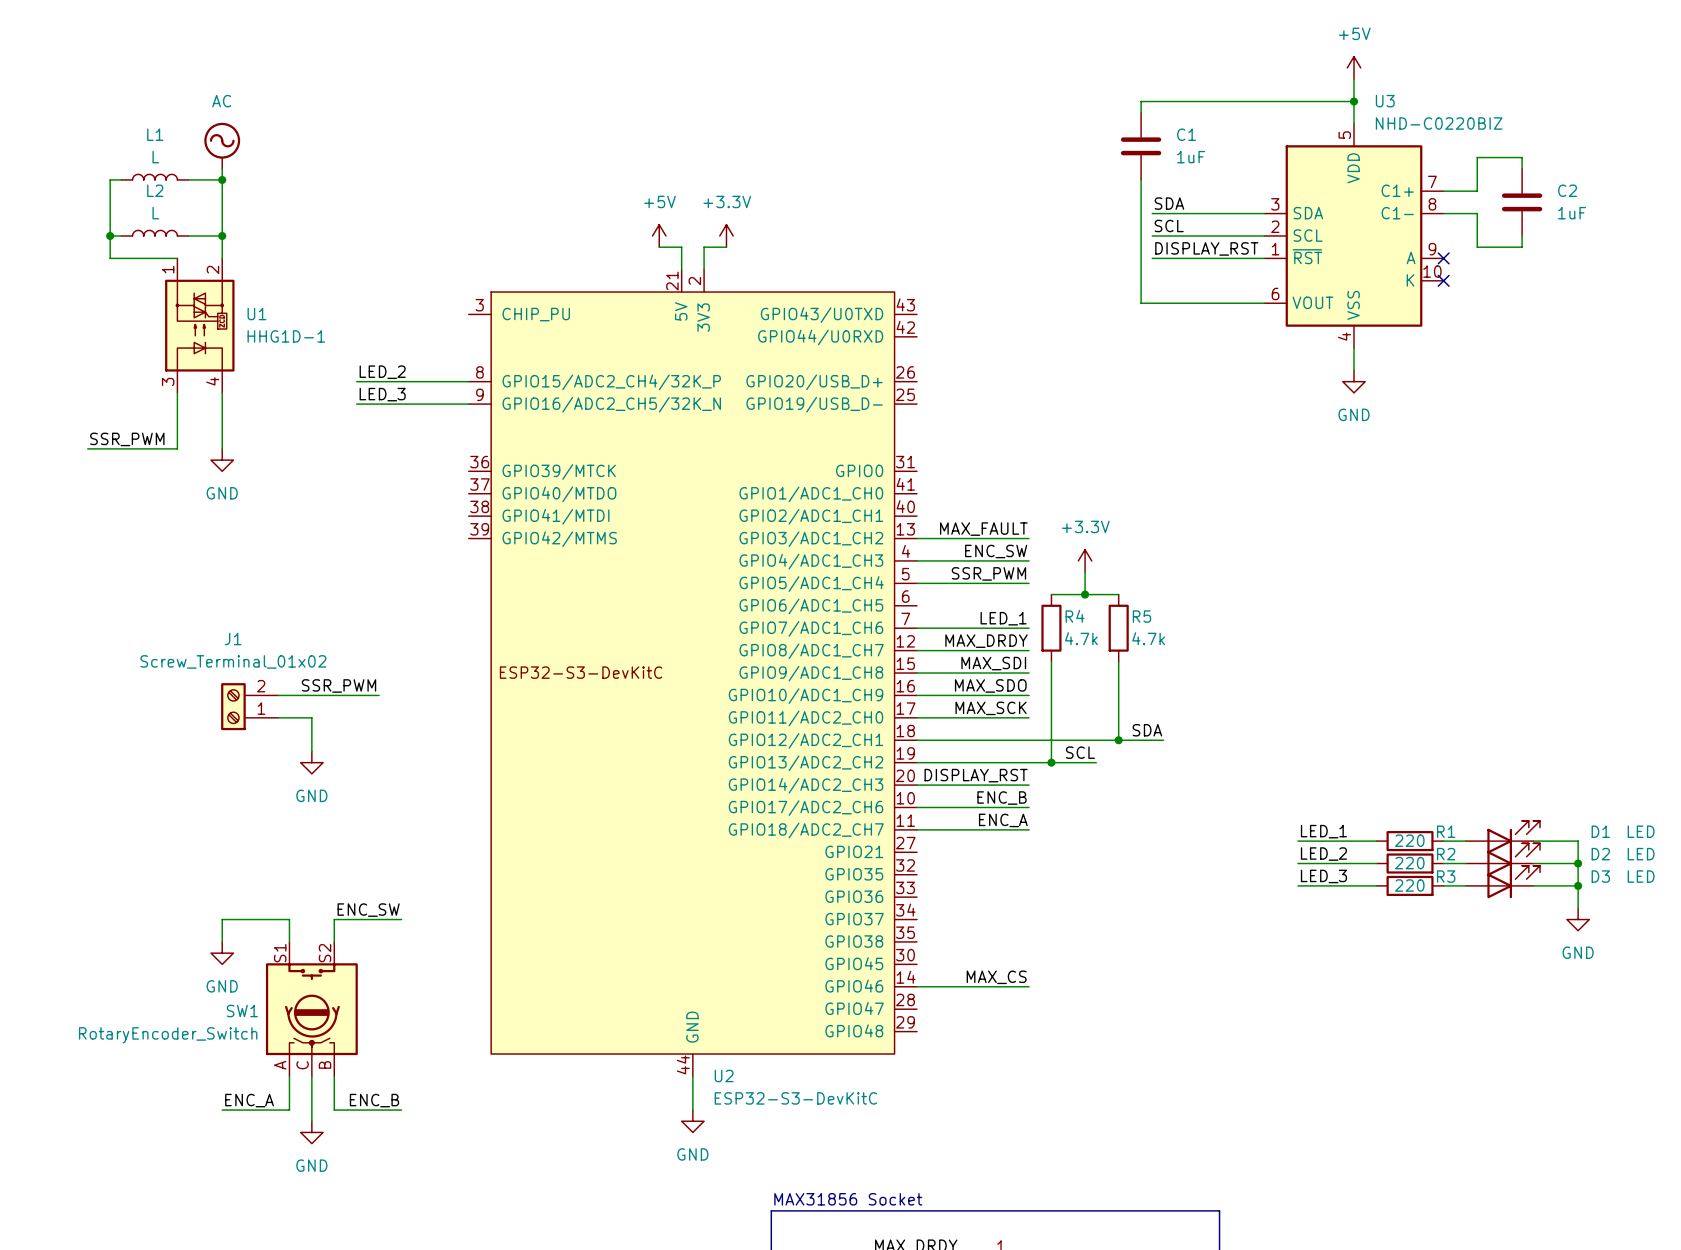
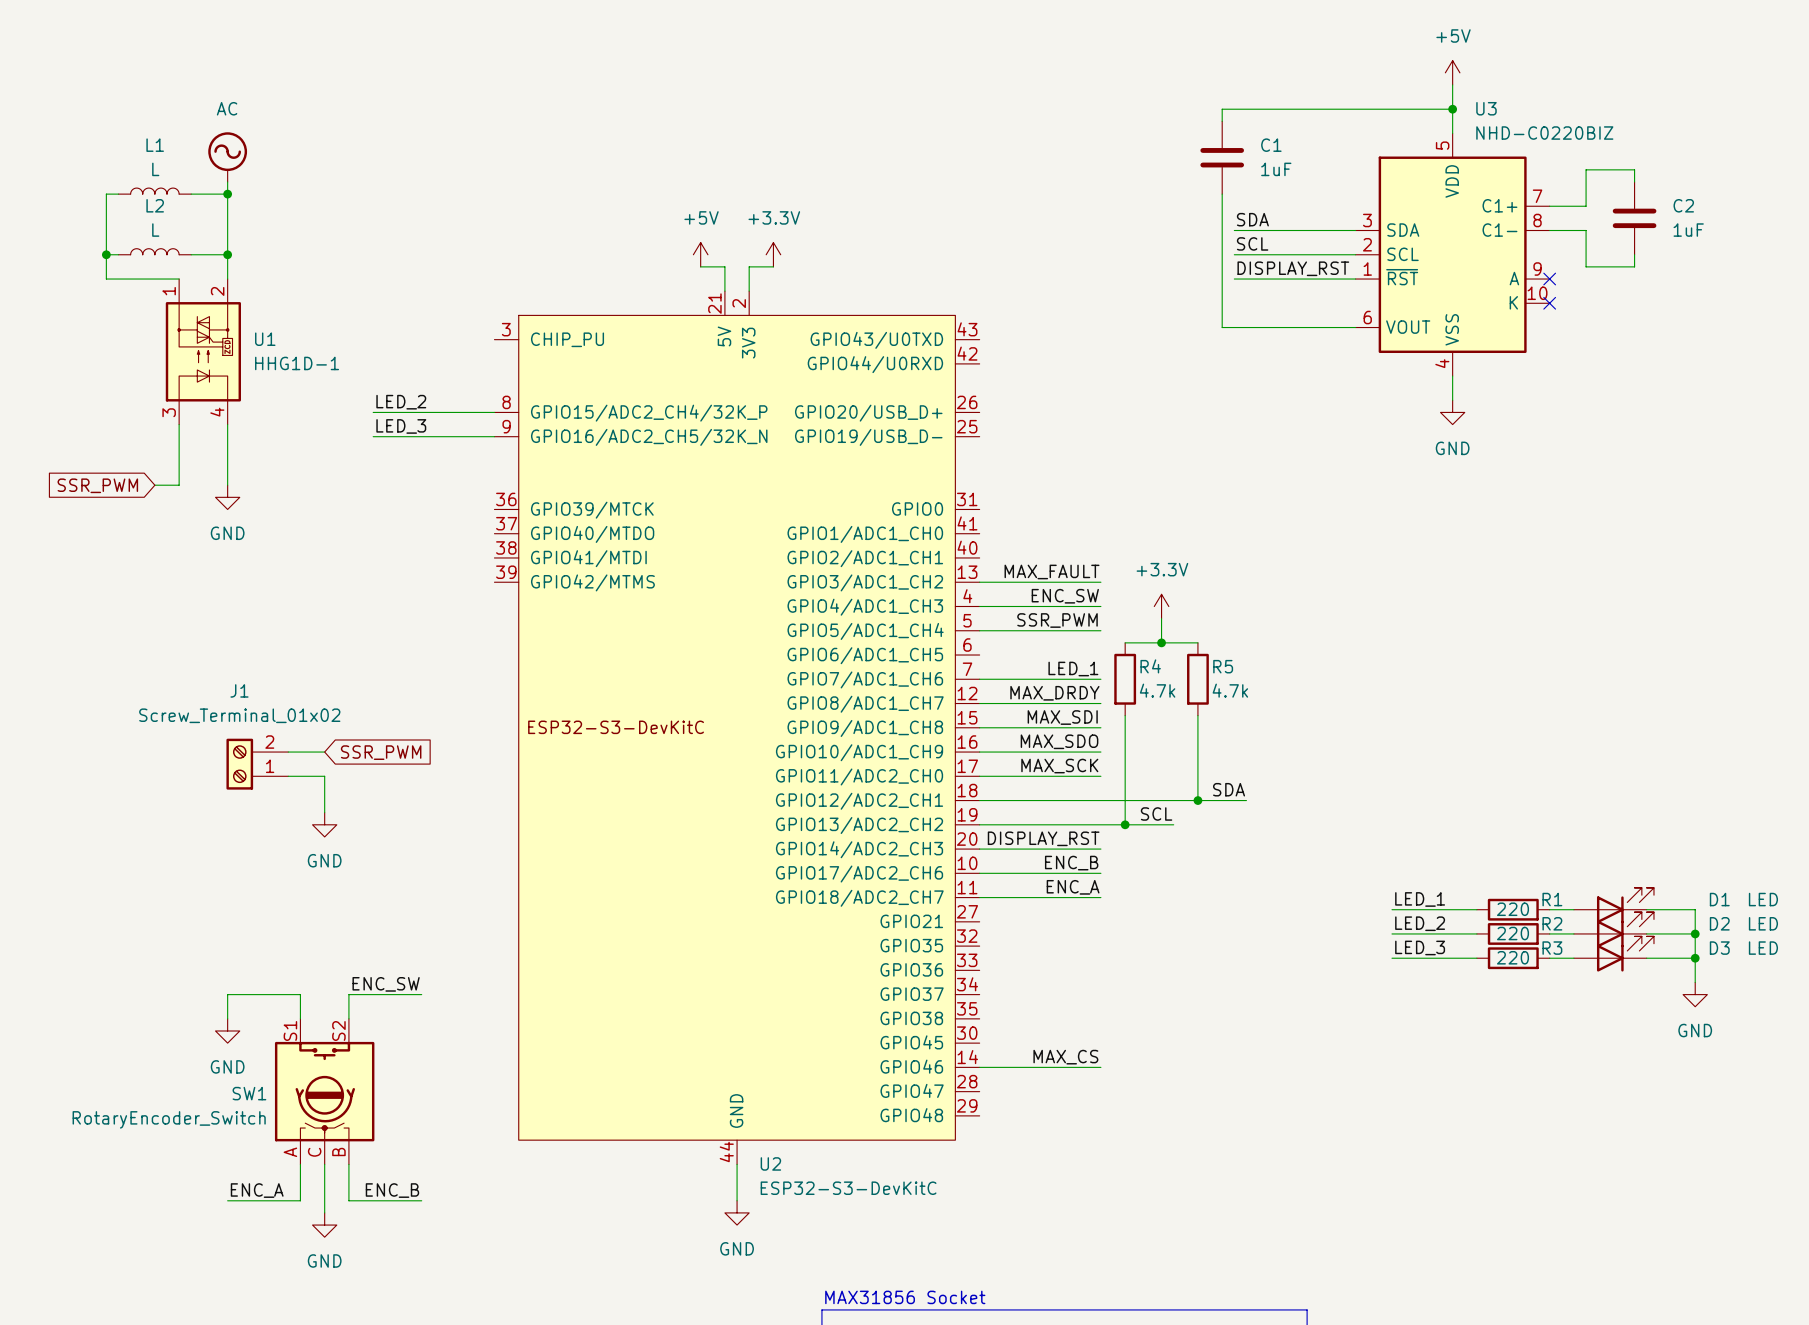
label: SSR_PWM (127, 439) -> none
wire: (87, 448) (154, 448) -> none
global label: none -> SSR_PWM (97, 485)
label: SSR_PWM (339, 685) -> none
wire: (311, 695) (379, 695) -> none
global label: none -> SSR_PWM (381, 752)

